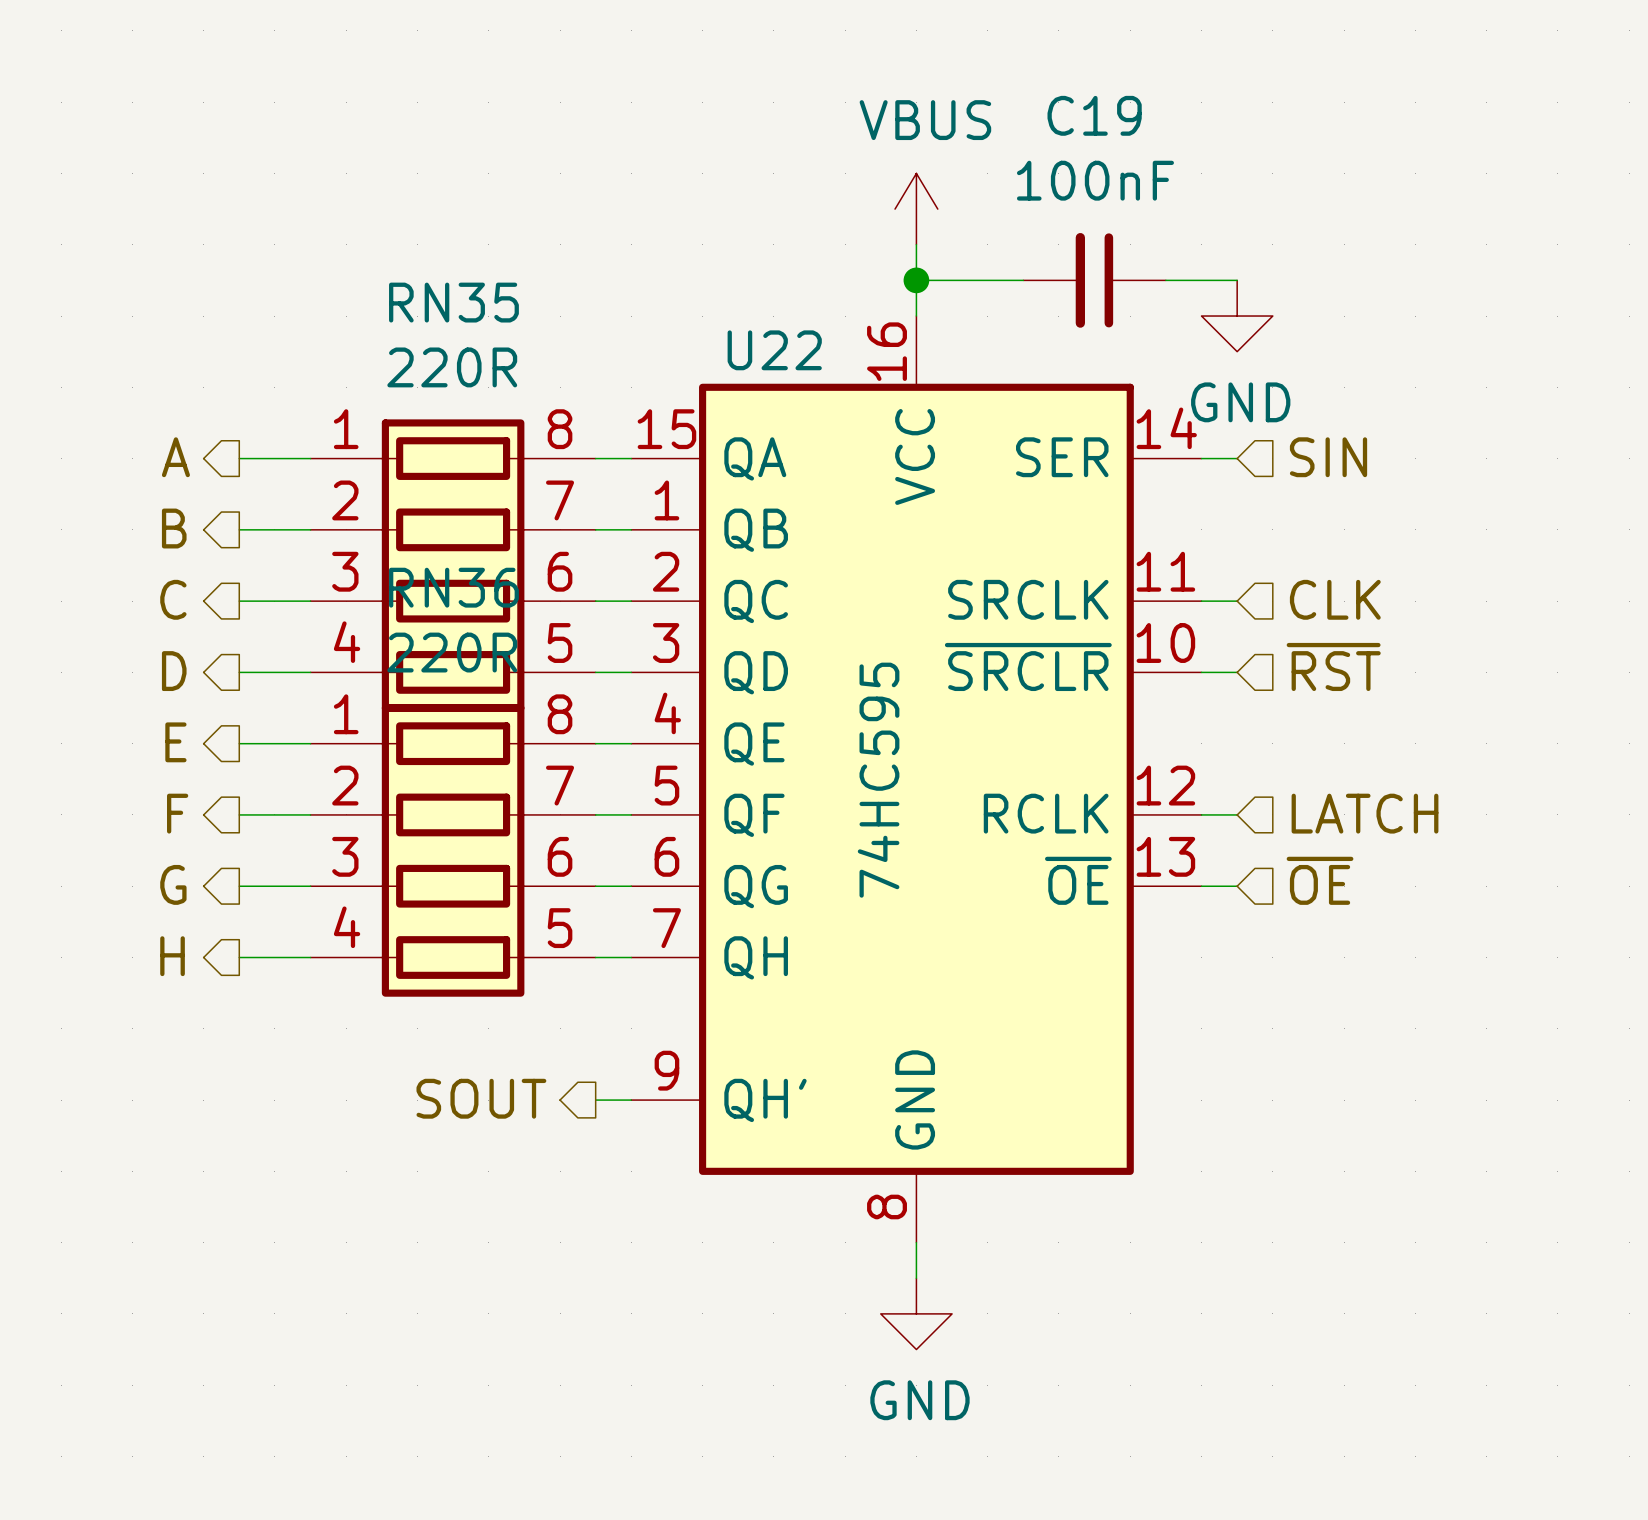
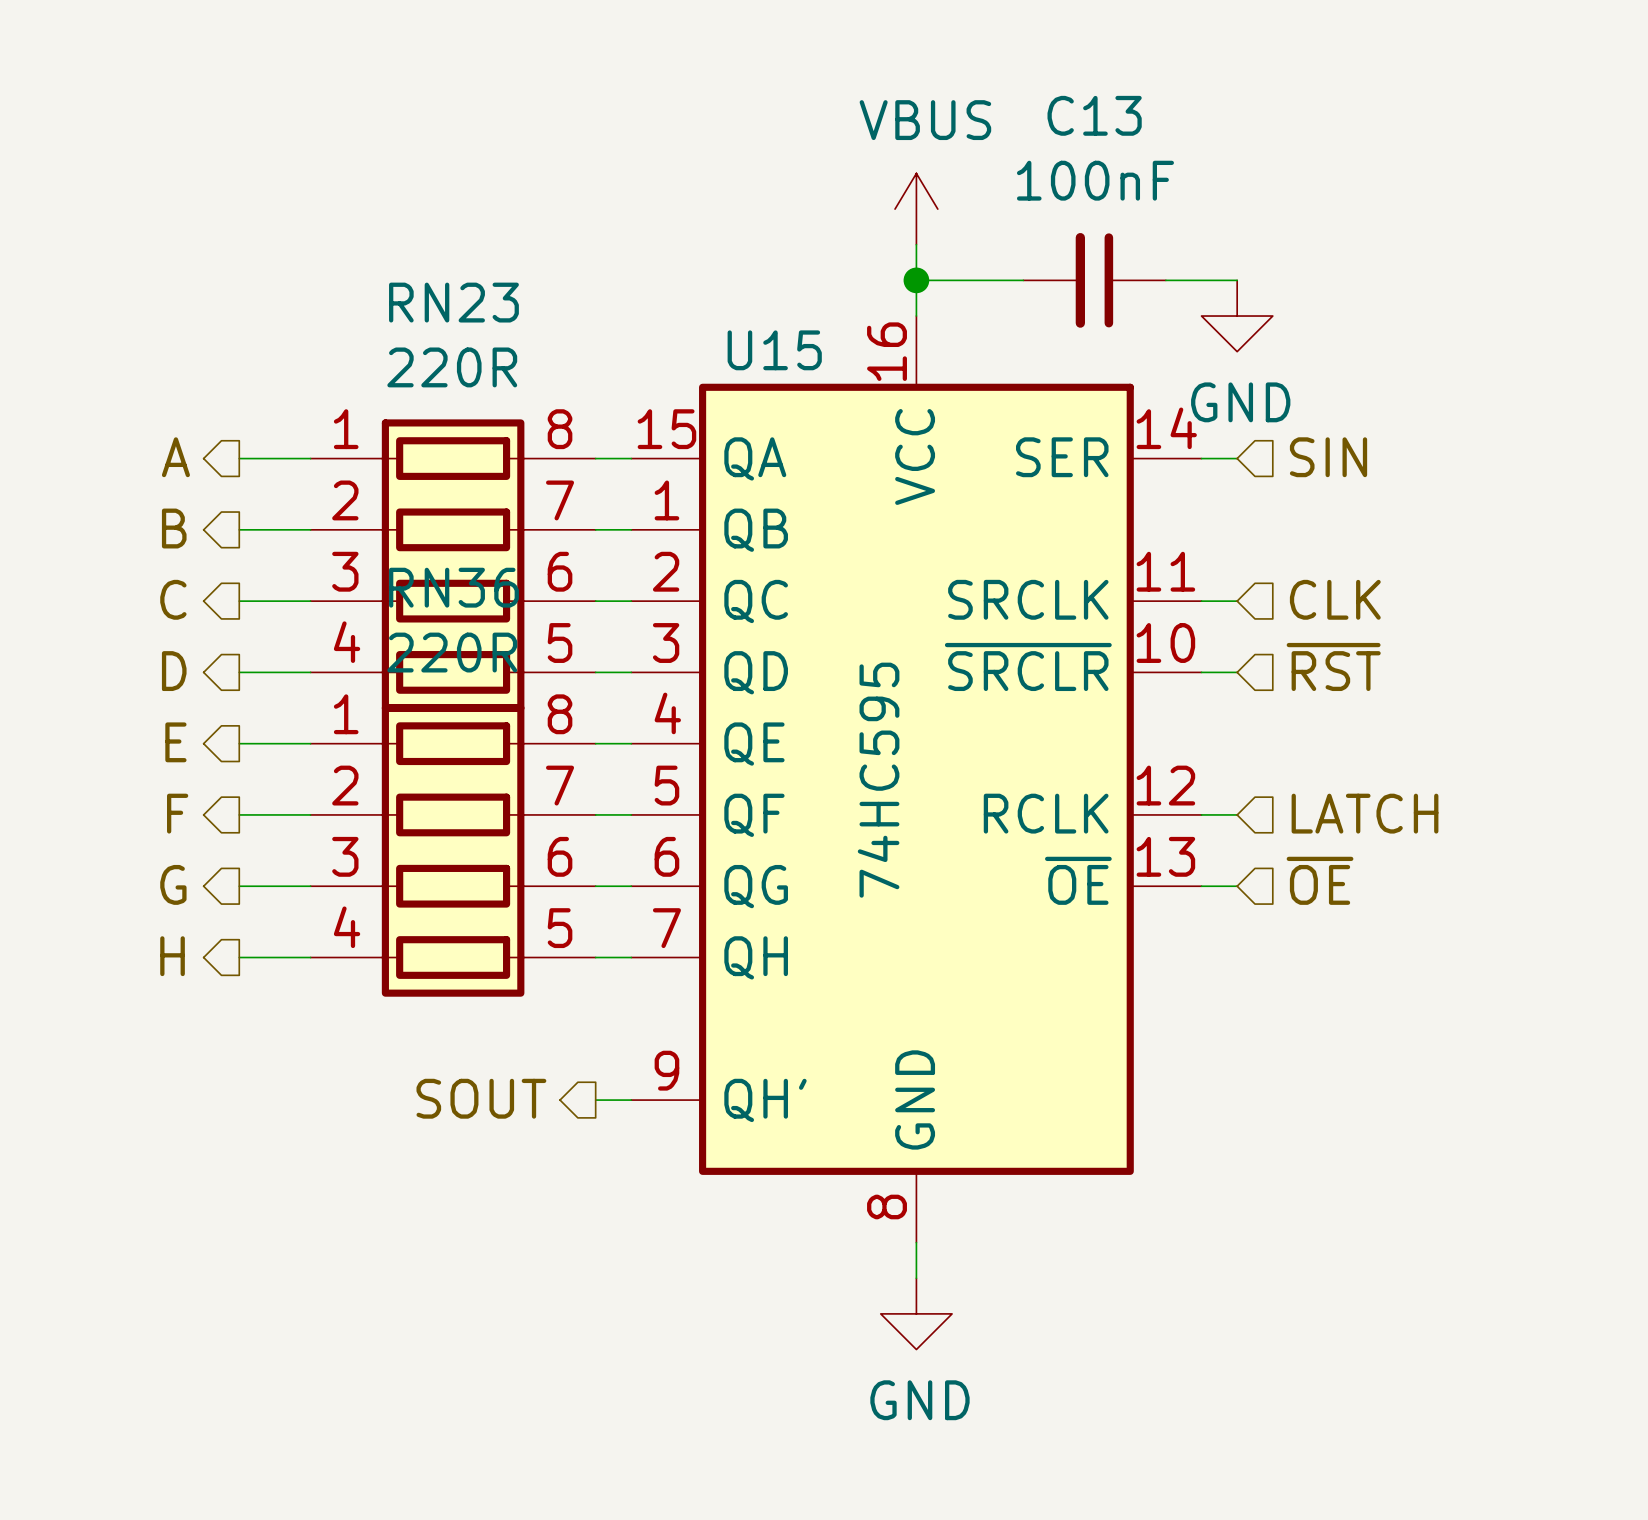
C19 name: C19 (1094, 115) -> C13 (1094, 115)
RN35 name: RN35 (453, 302) -> RN23 (453, 302)
U22 name: U22 (774, 350) -> U15 (774, 350)

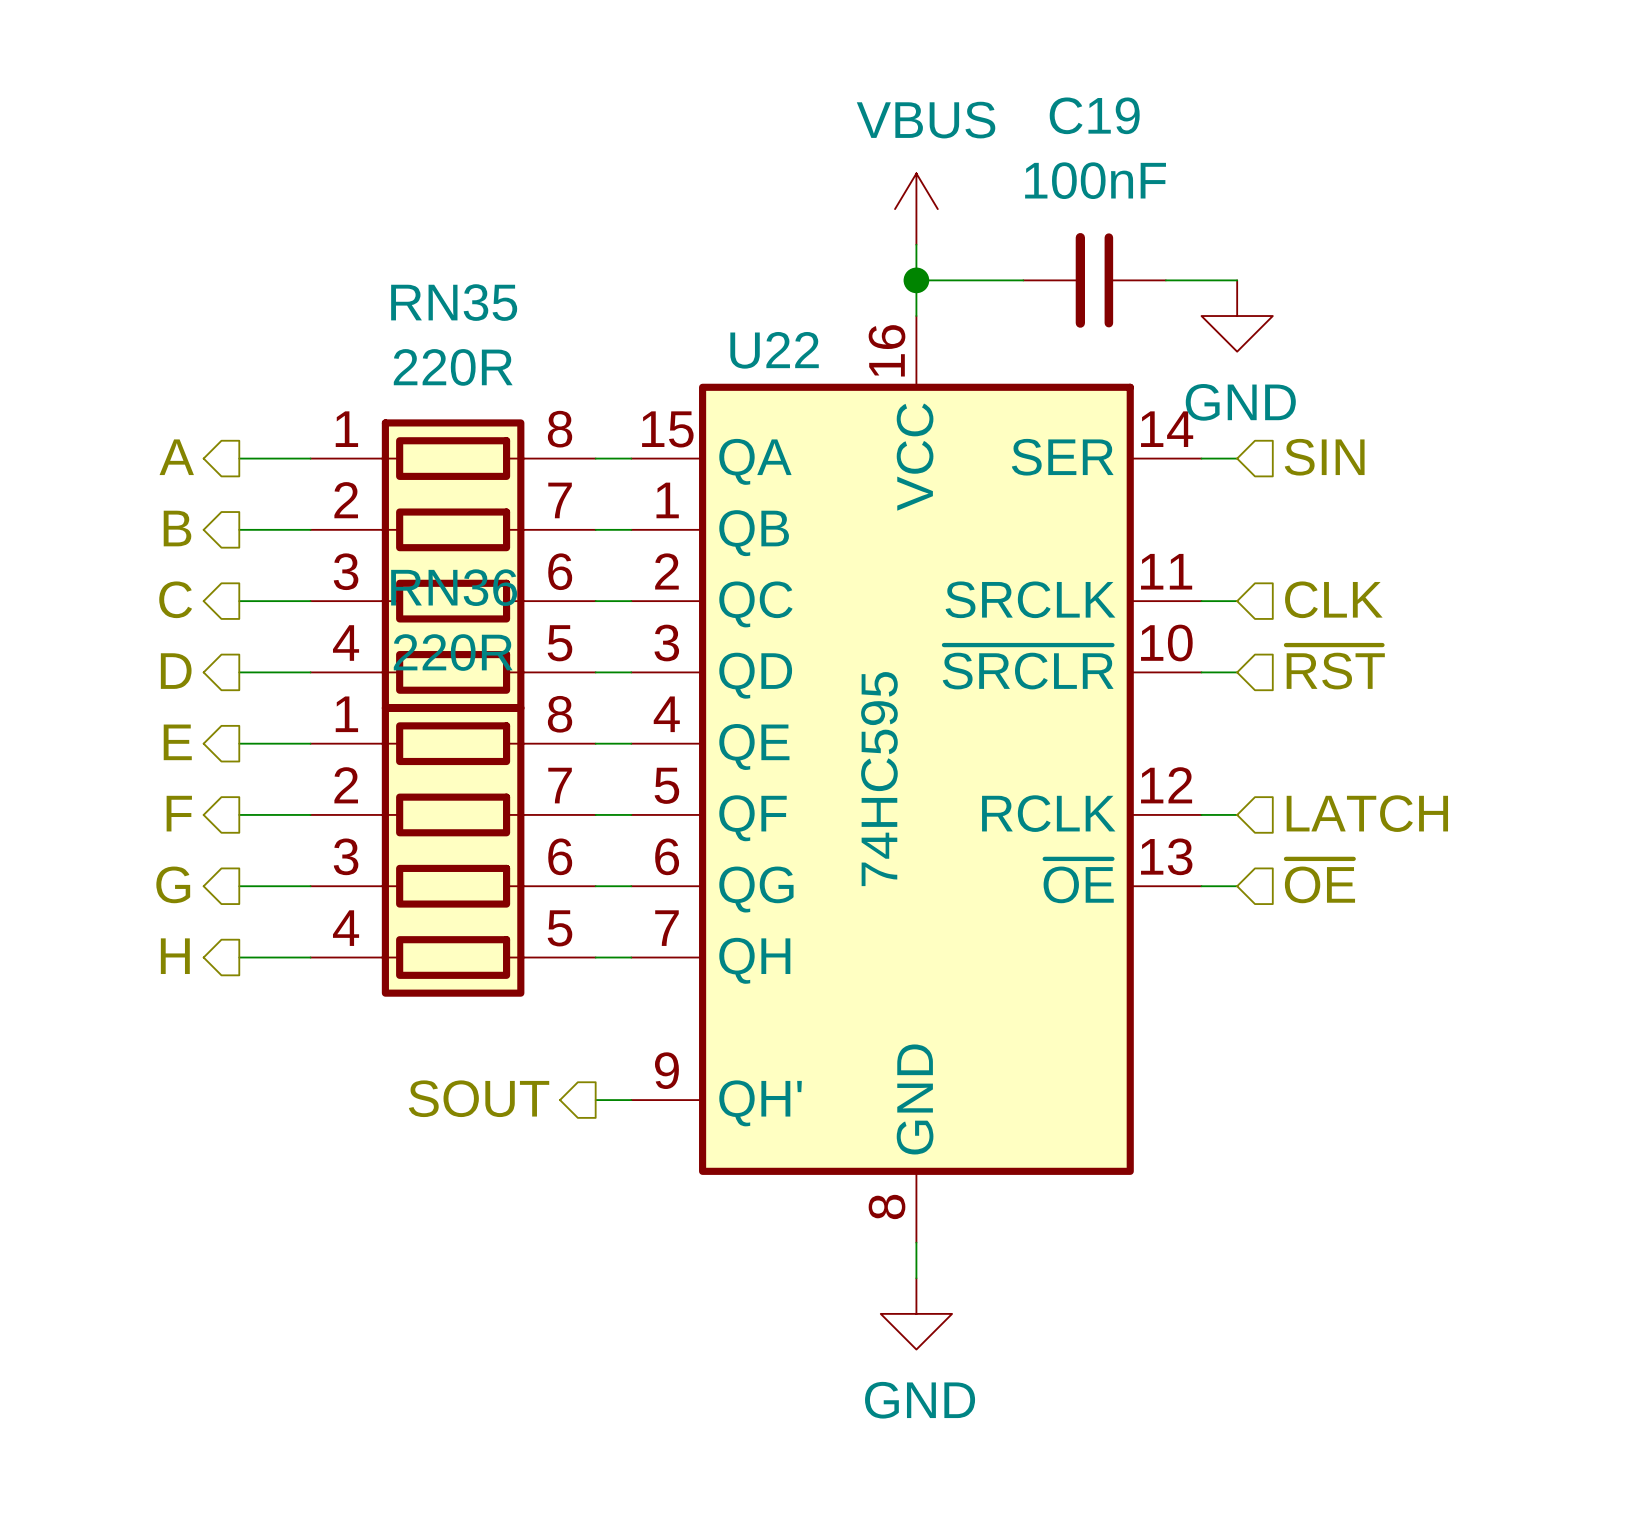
C13 name: C13 (1094, 115) -> C19 (1094, 115)
RN23 name: RN23 (453, 302) -> RN35 (454, 302)
U15 name: U15 (774, 350) -> U22 (774, 350)

